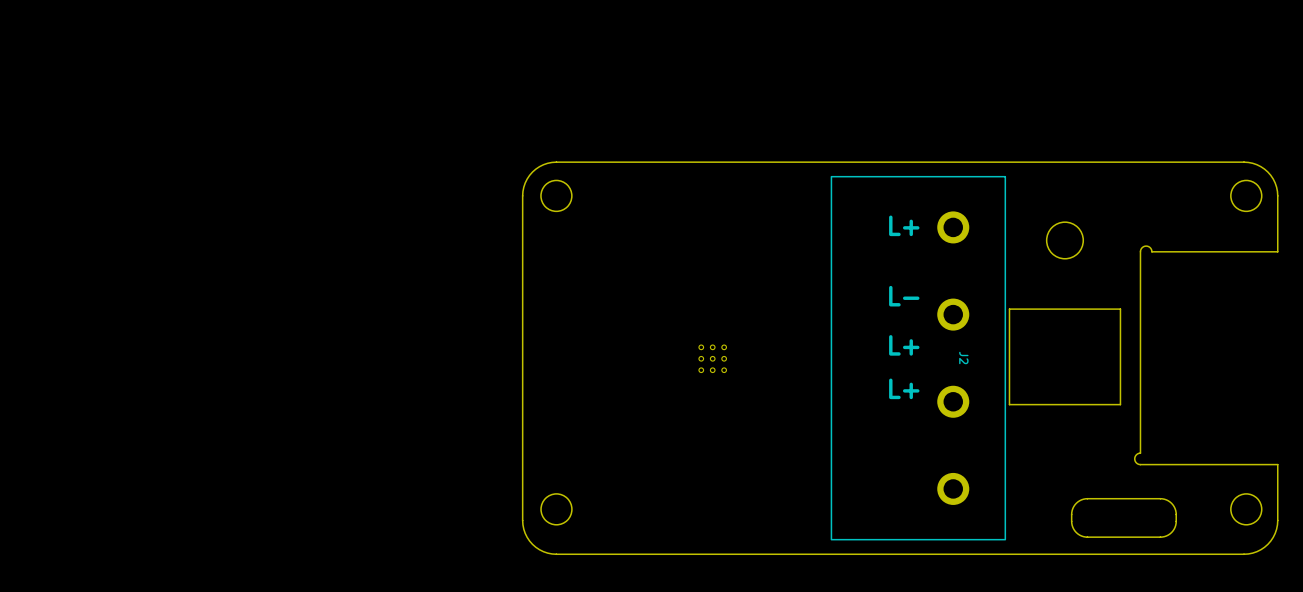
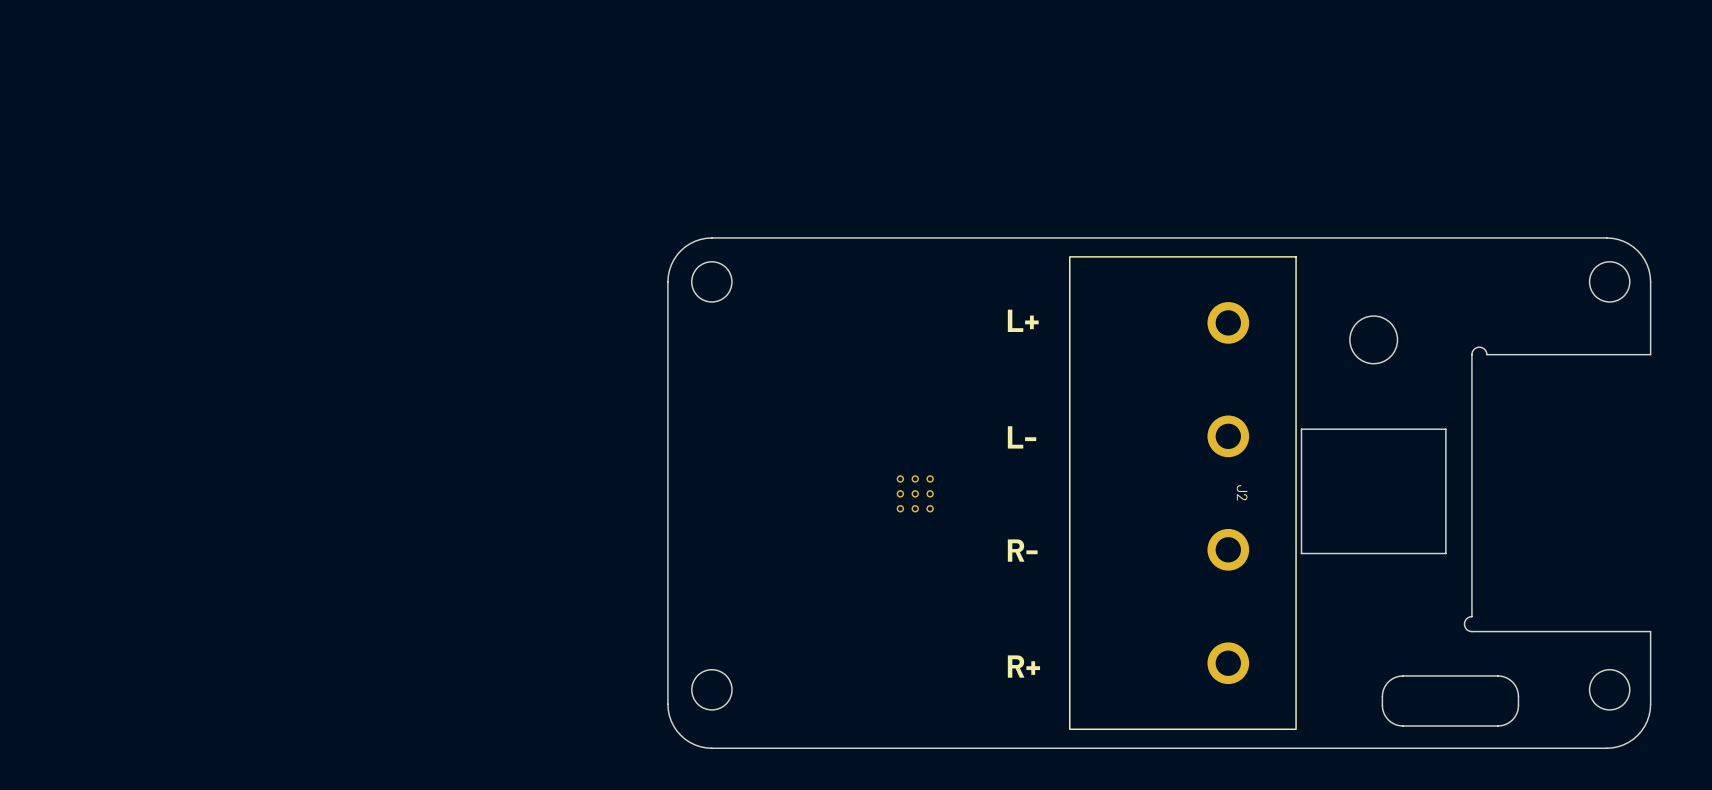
text: none -> L+ (1023, 320)
text: L+ (904, 225) -> none
text position: L- (904, 296) -> L- (1022, 437)
text: L+ (904, 345) -> none
text: L+ (904, 388) -> none
text: none -> R- (1022, 550)
text: none -> R+ (1023, 666)

